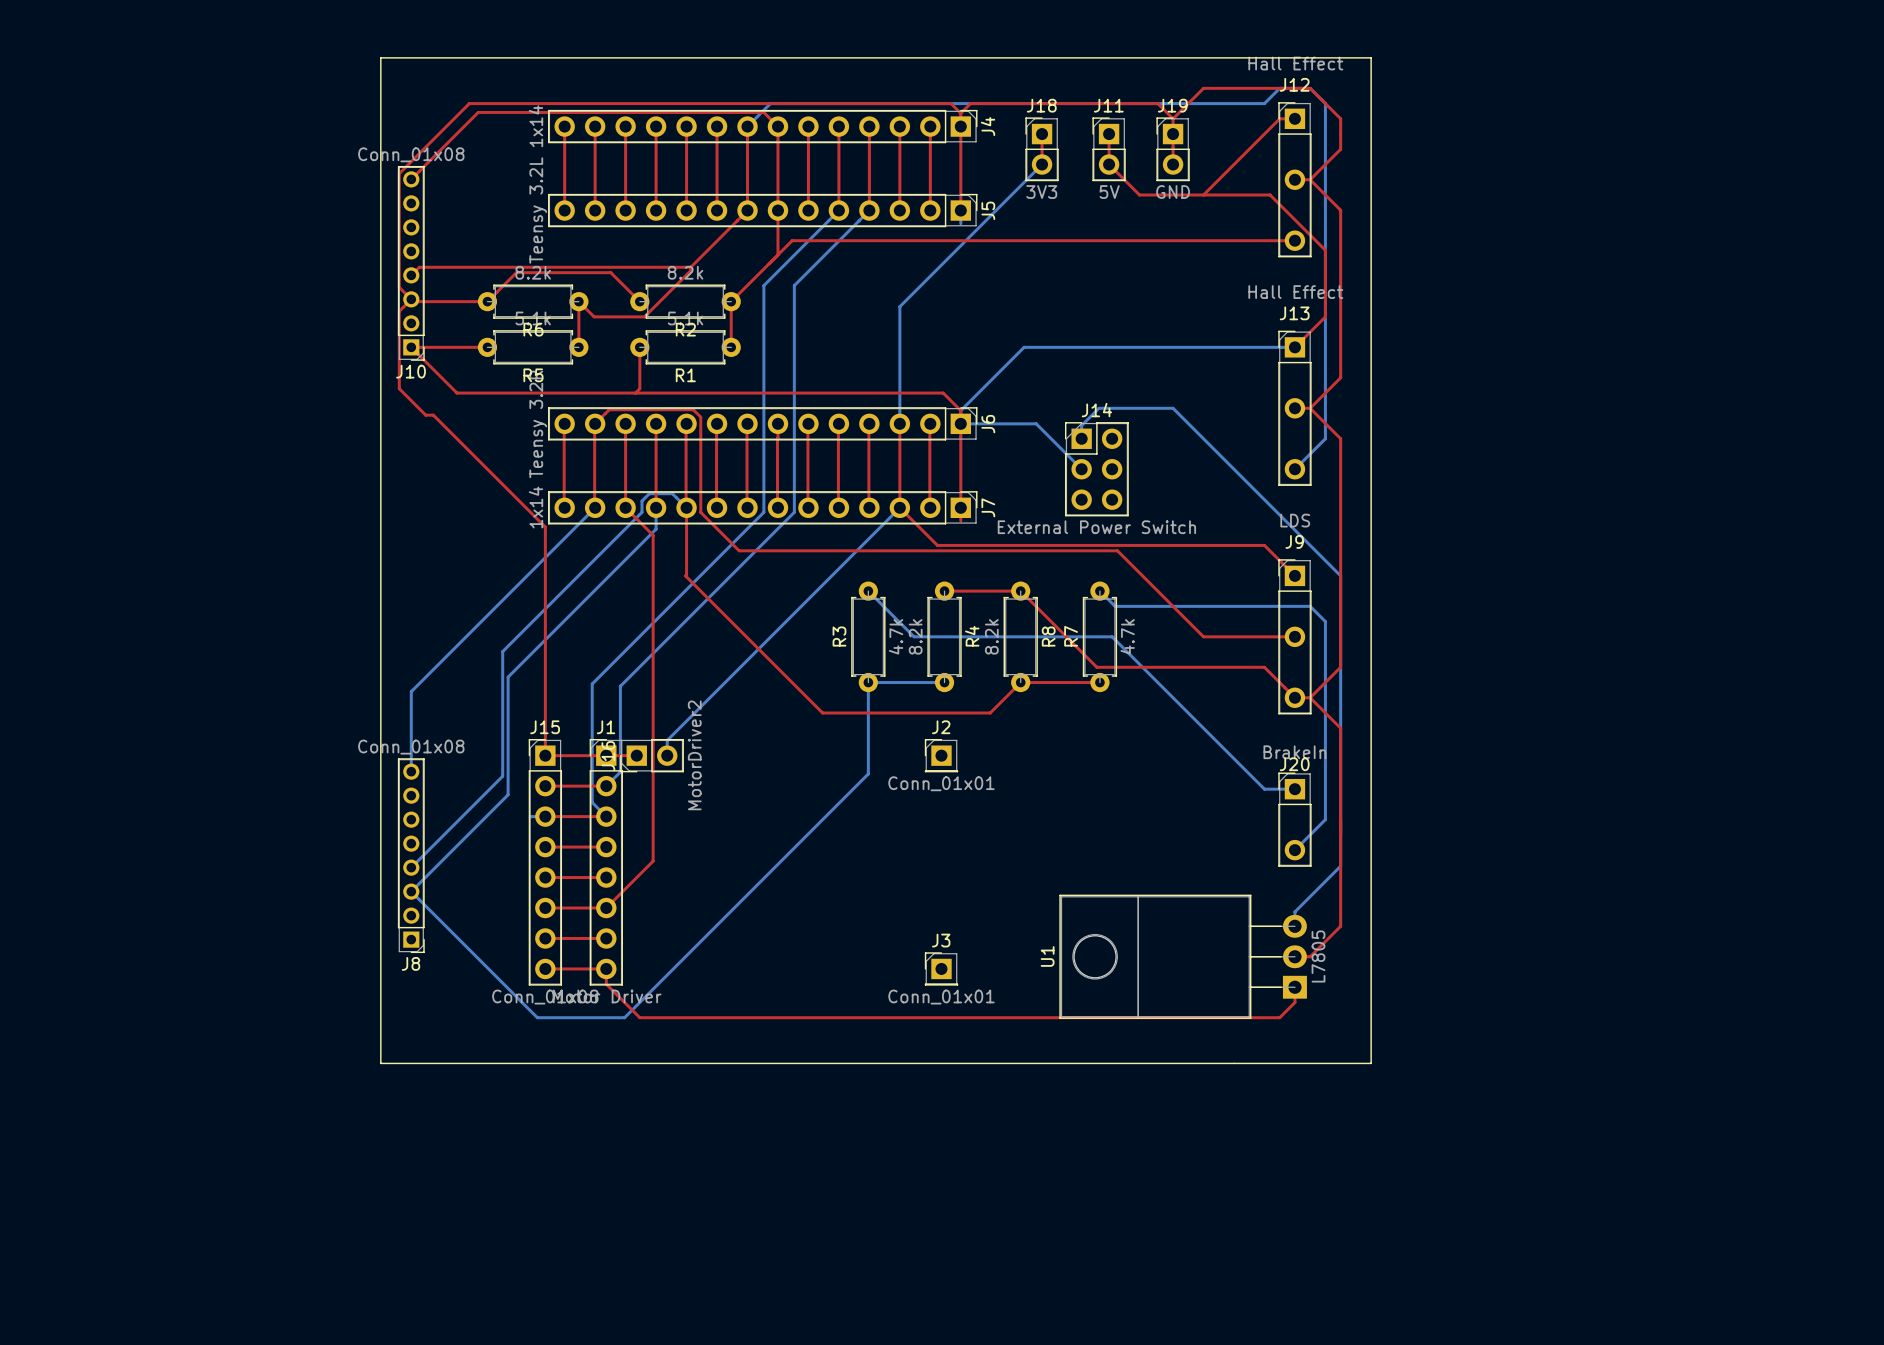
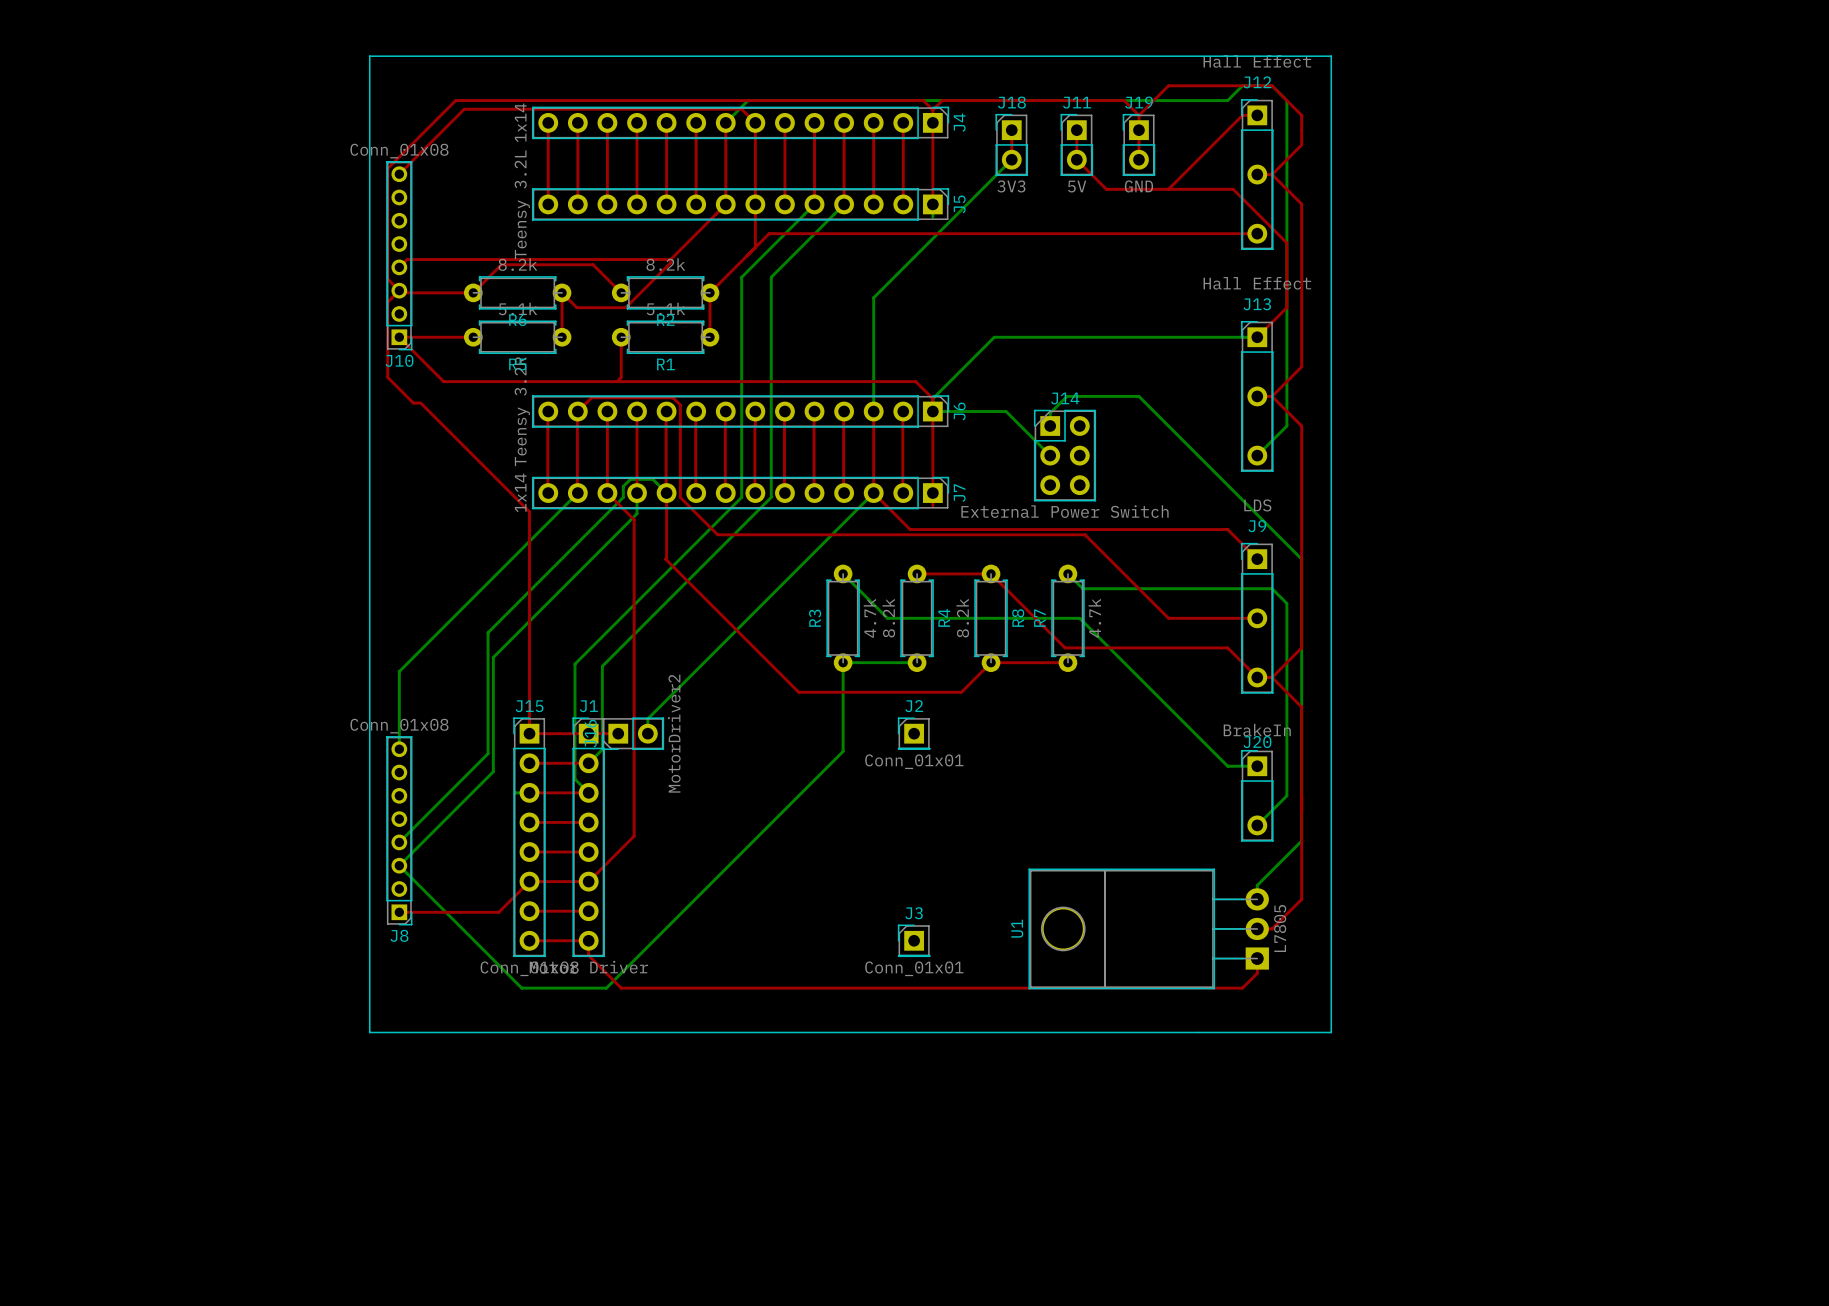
top track: none -> (529, 881) (498, 912) (399, 912)

